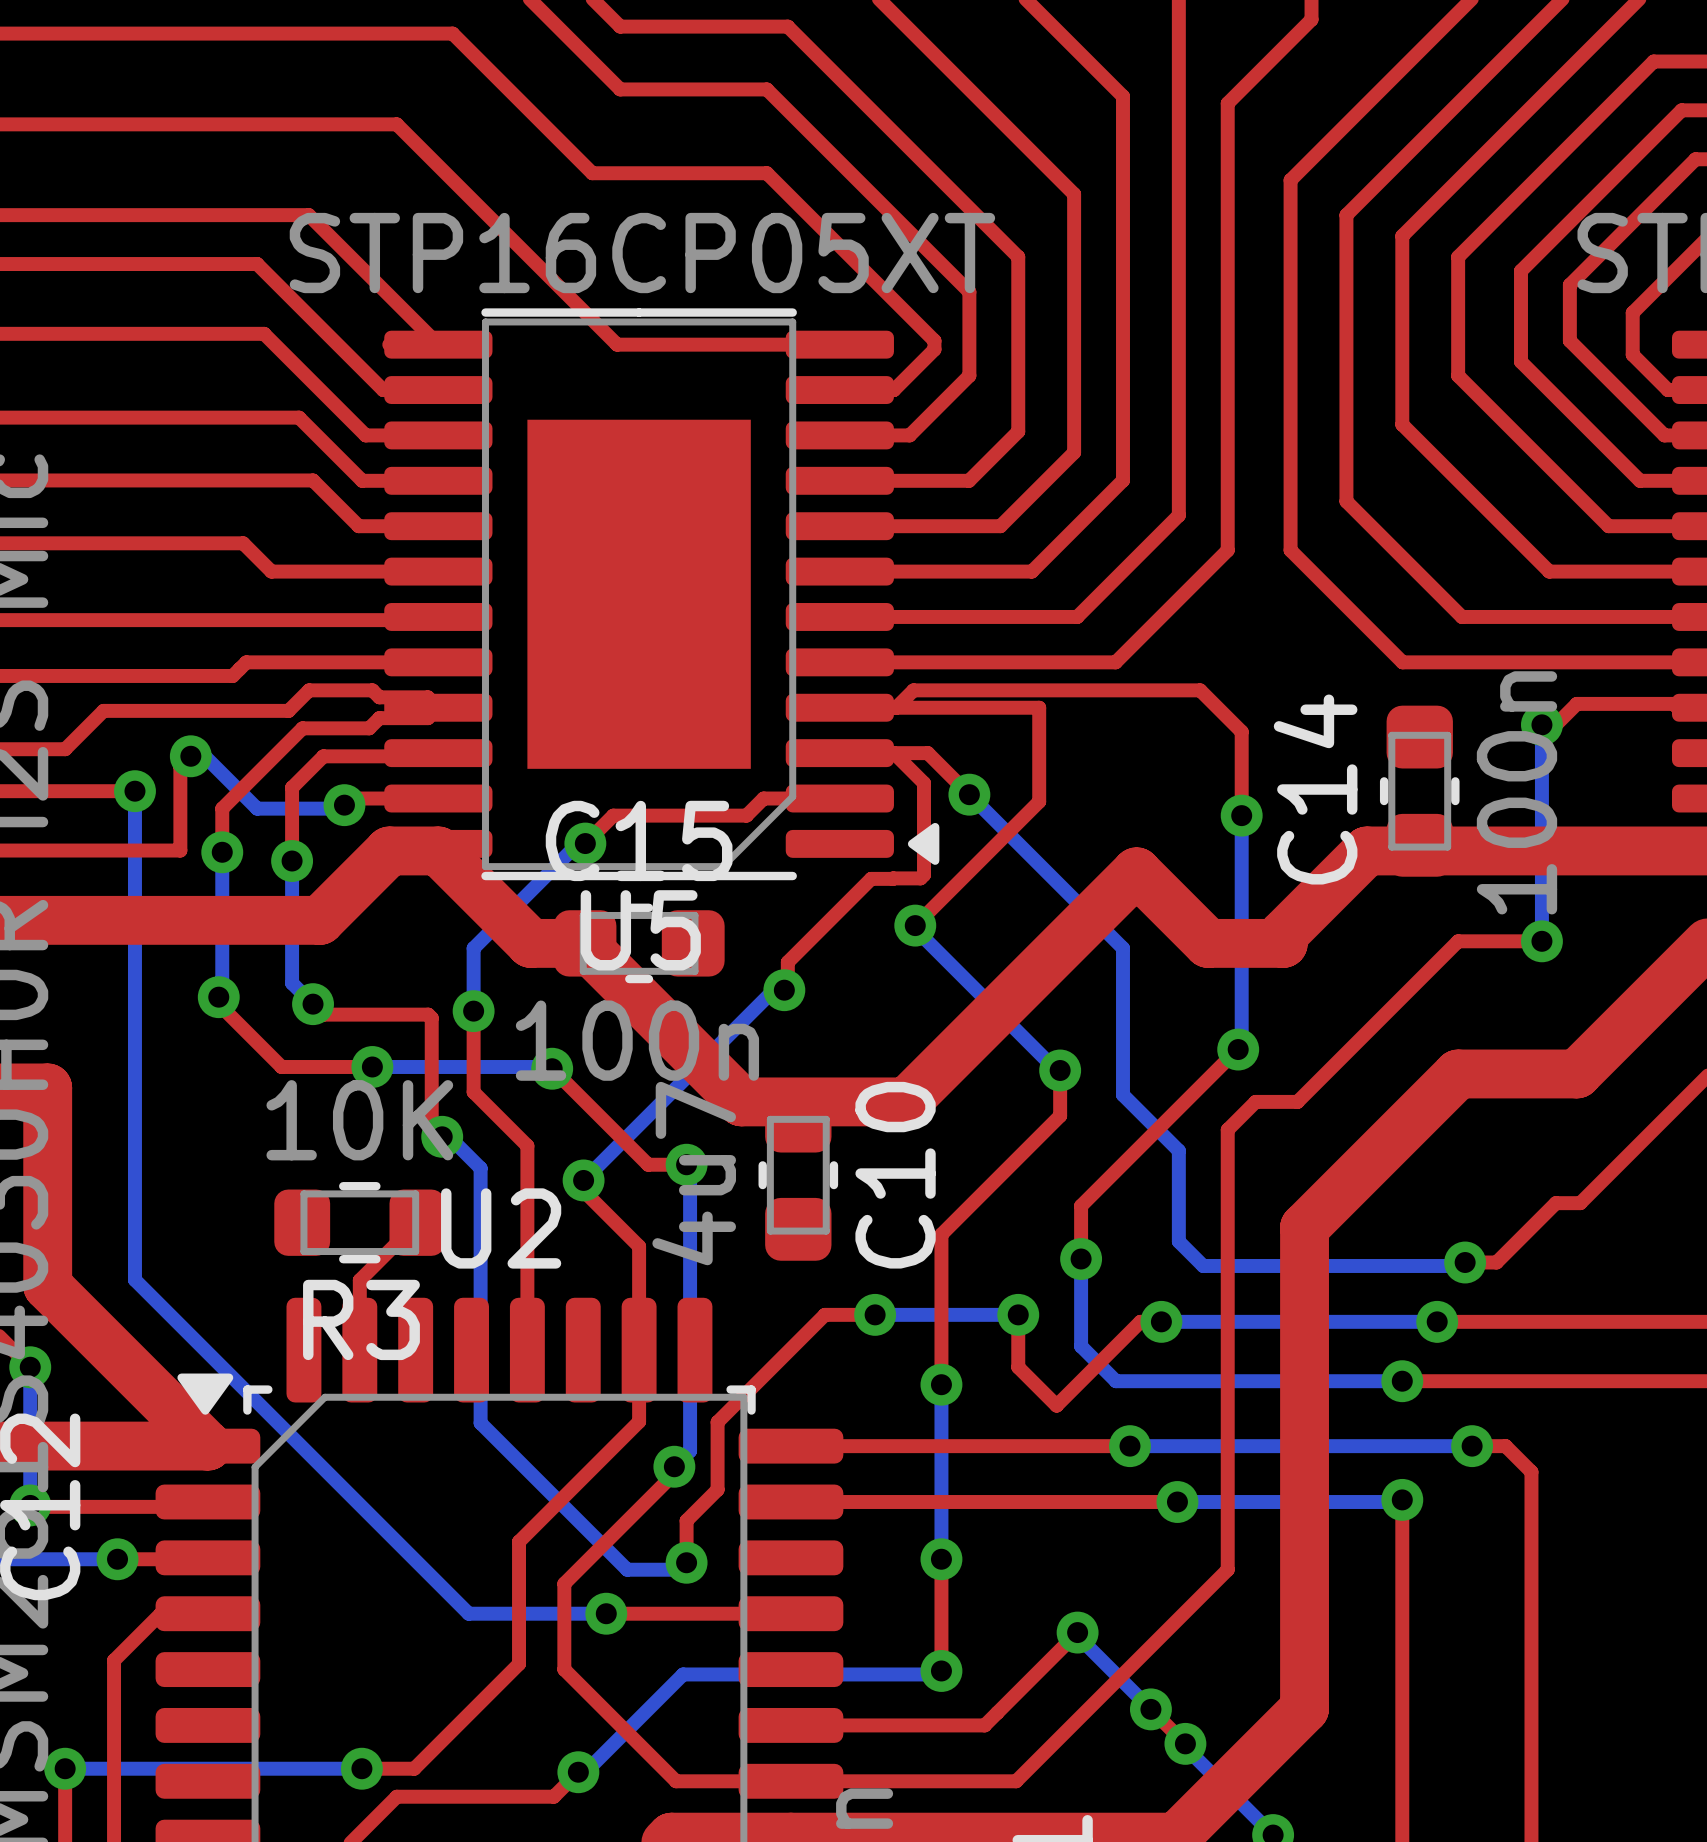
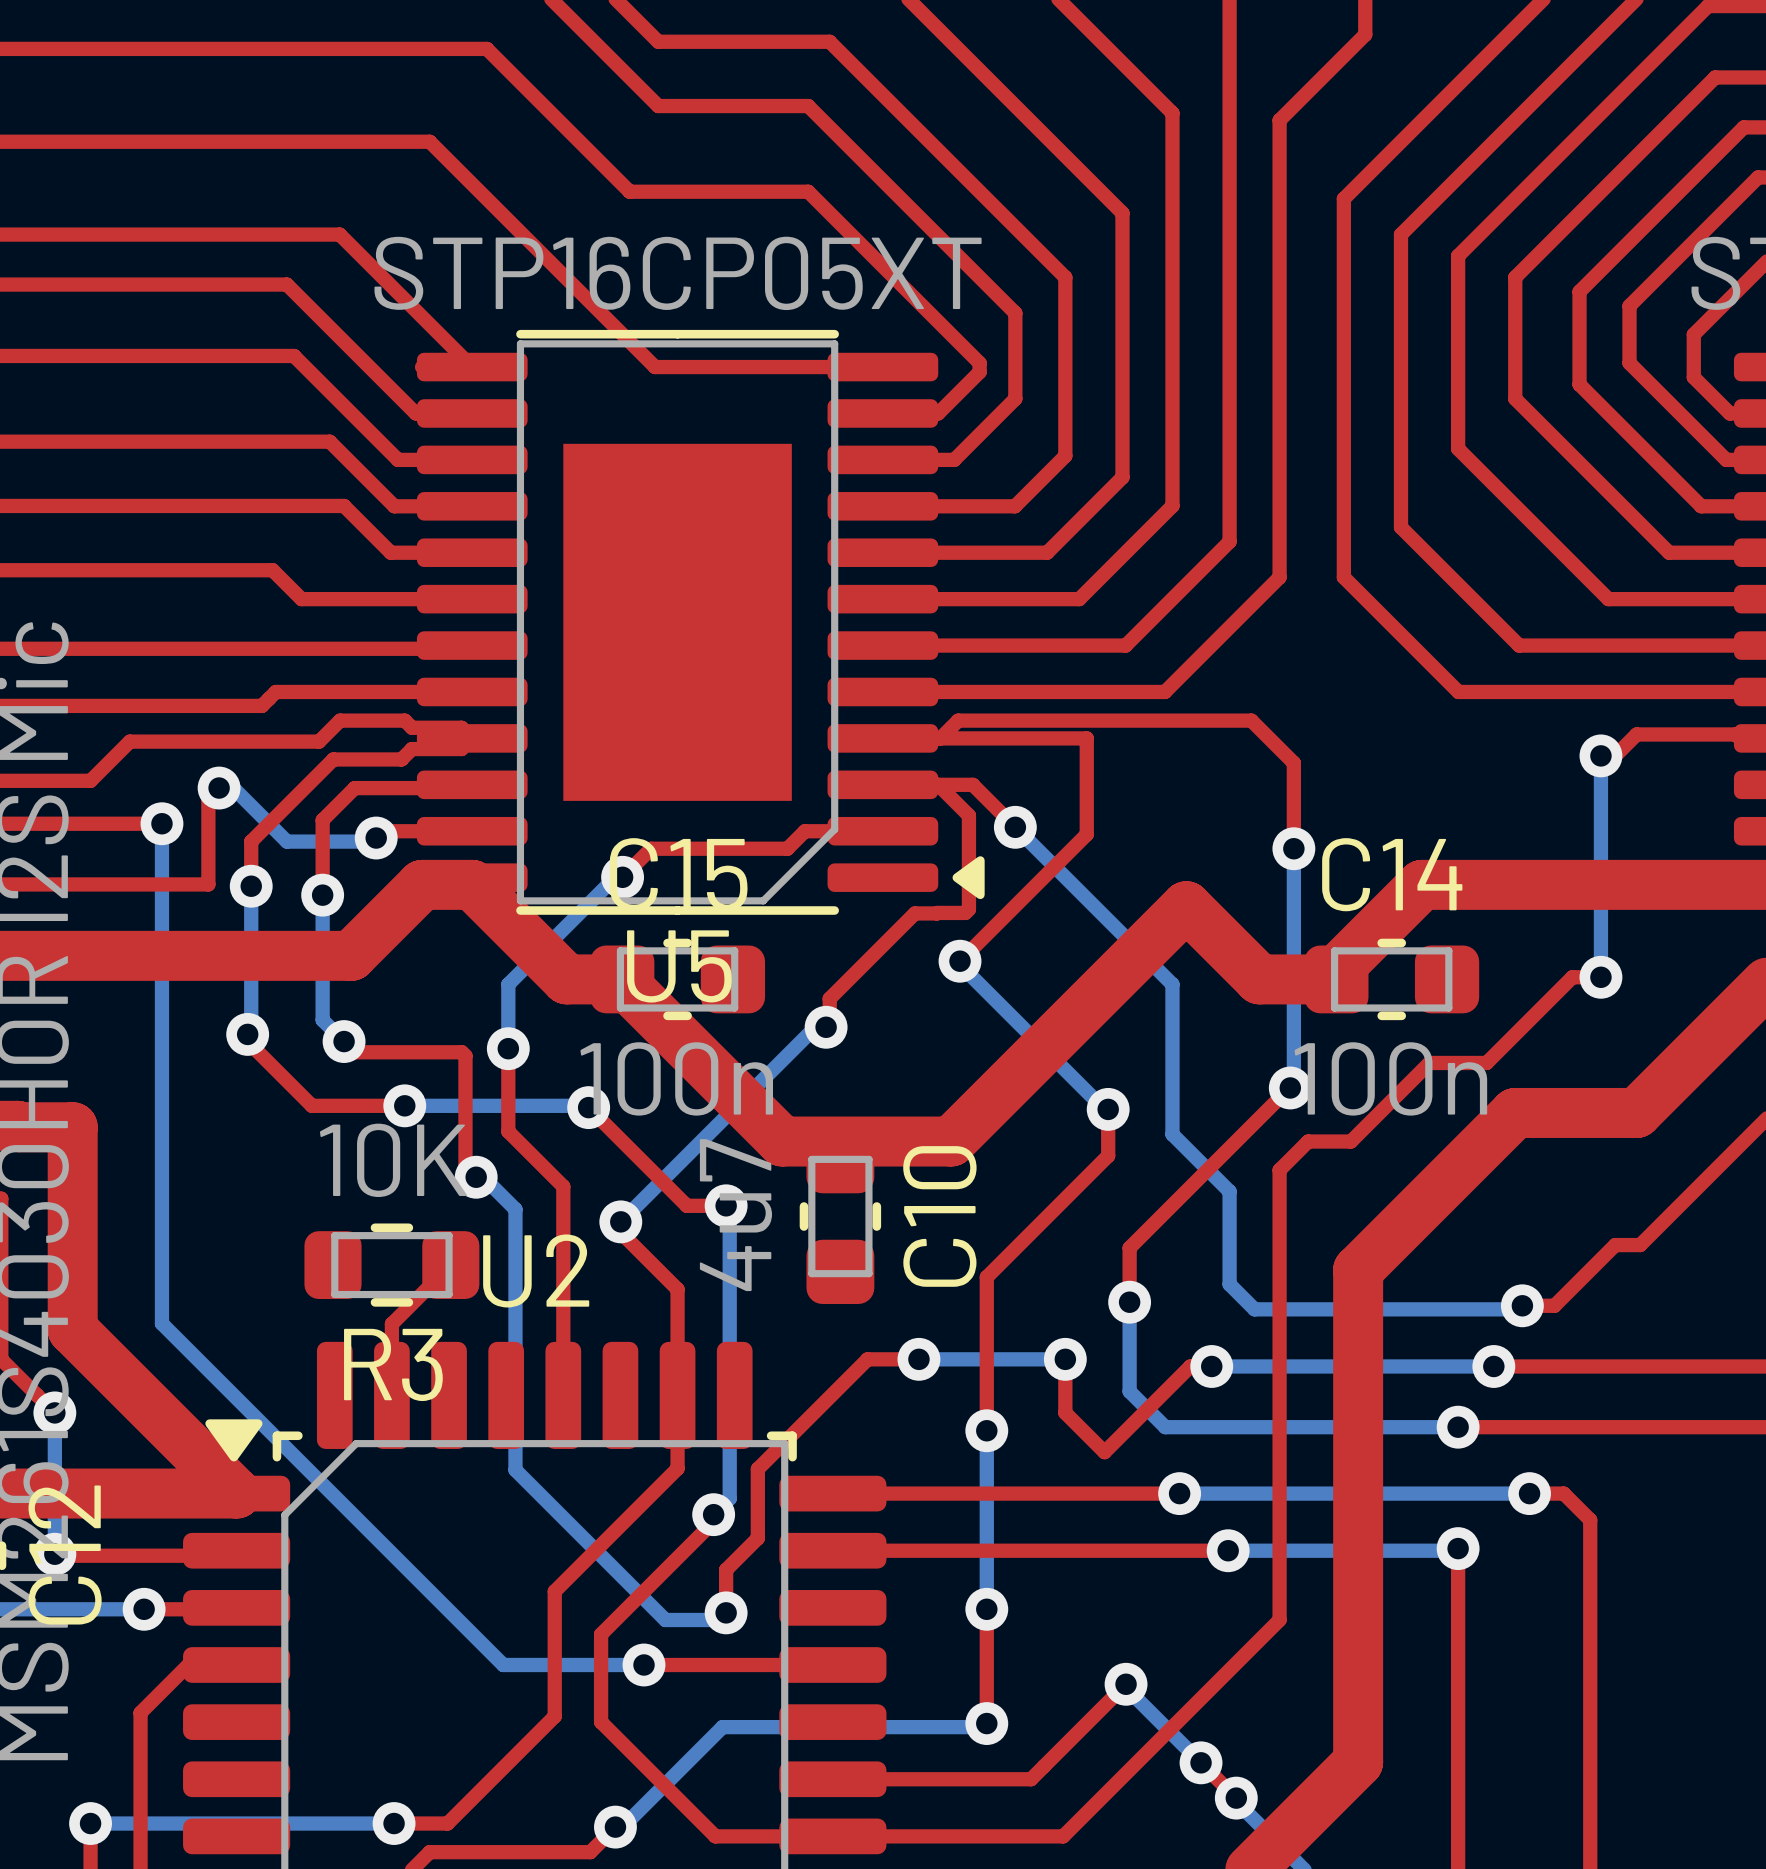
C14 rotation: 0° (1419, 791) -> 90° clockwise (1391, 979)
C14 position: (1419, 791) -> (1391, 979)
top track: (1514, 941) (1458, 941) (1374, 1025) -> (1572, 977) (1486, 1062) (1429, 1062)

